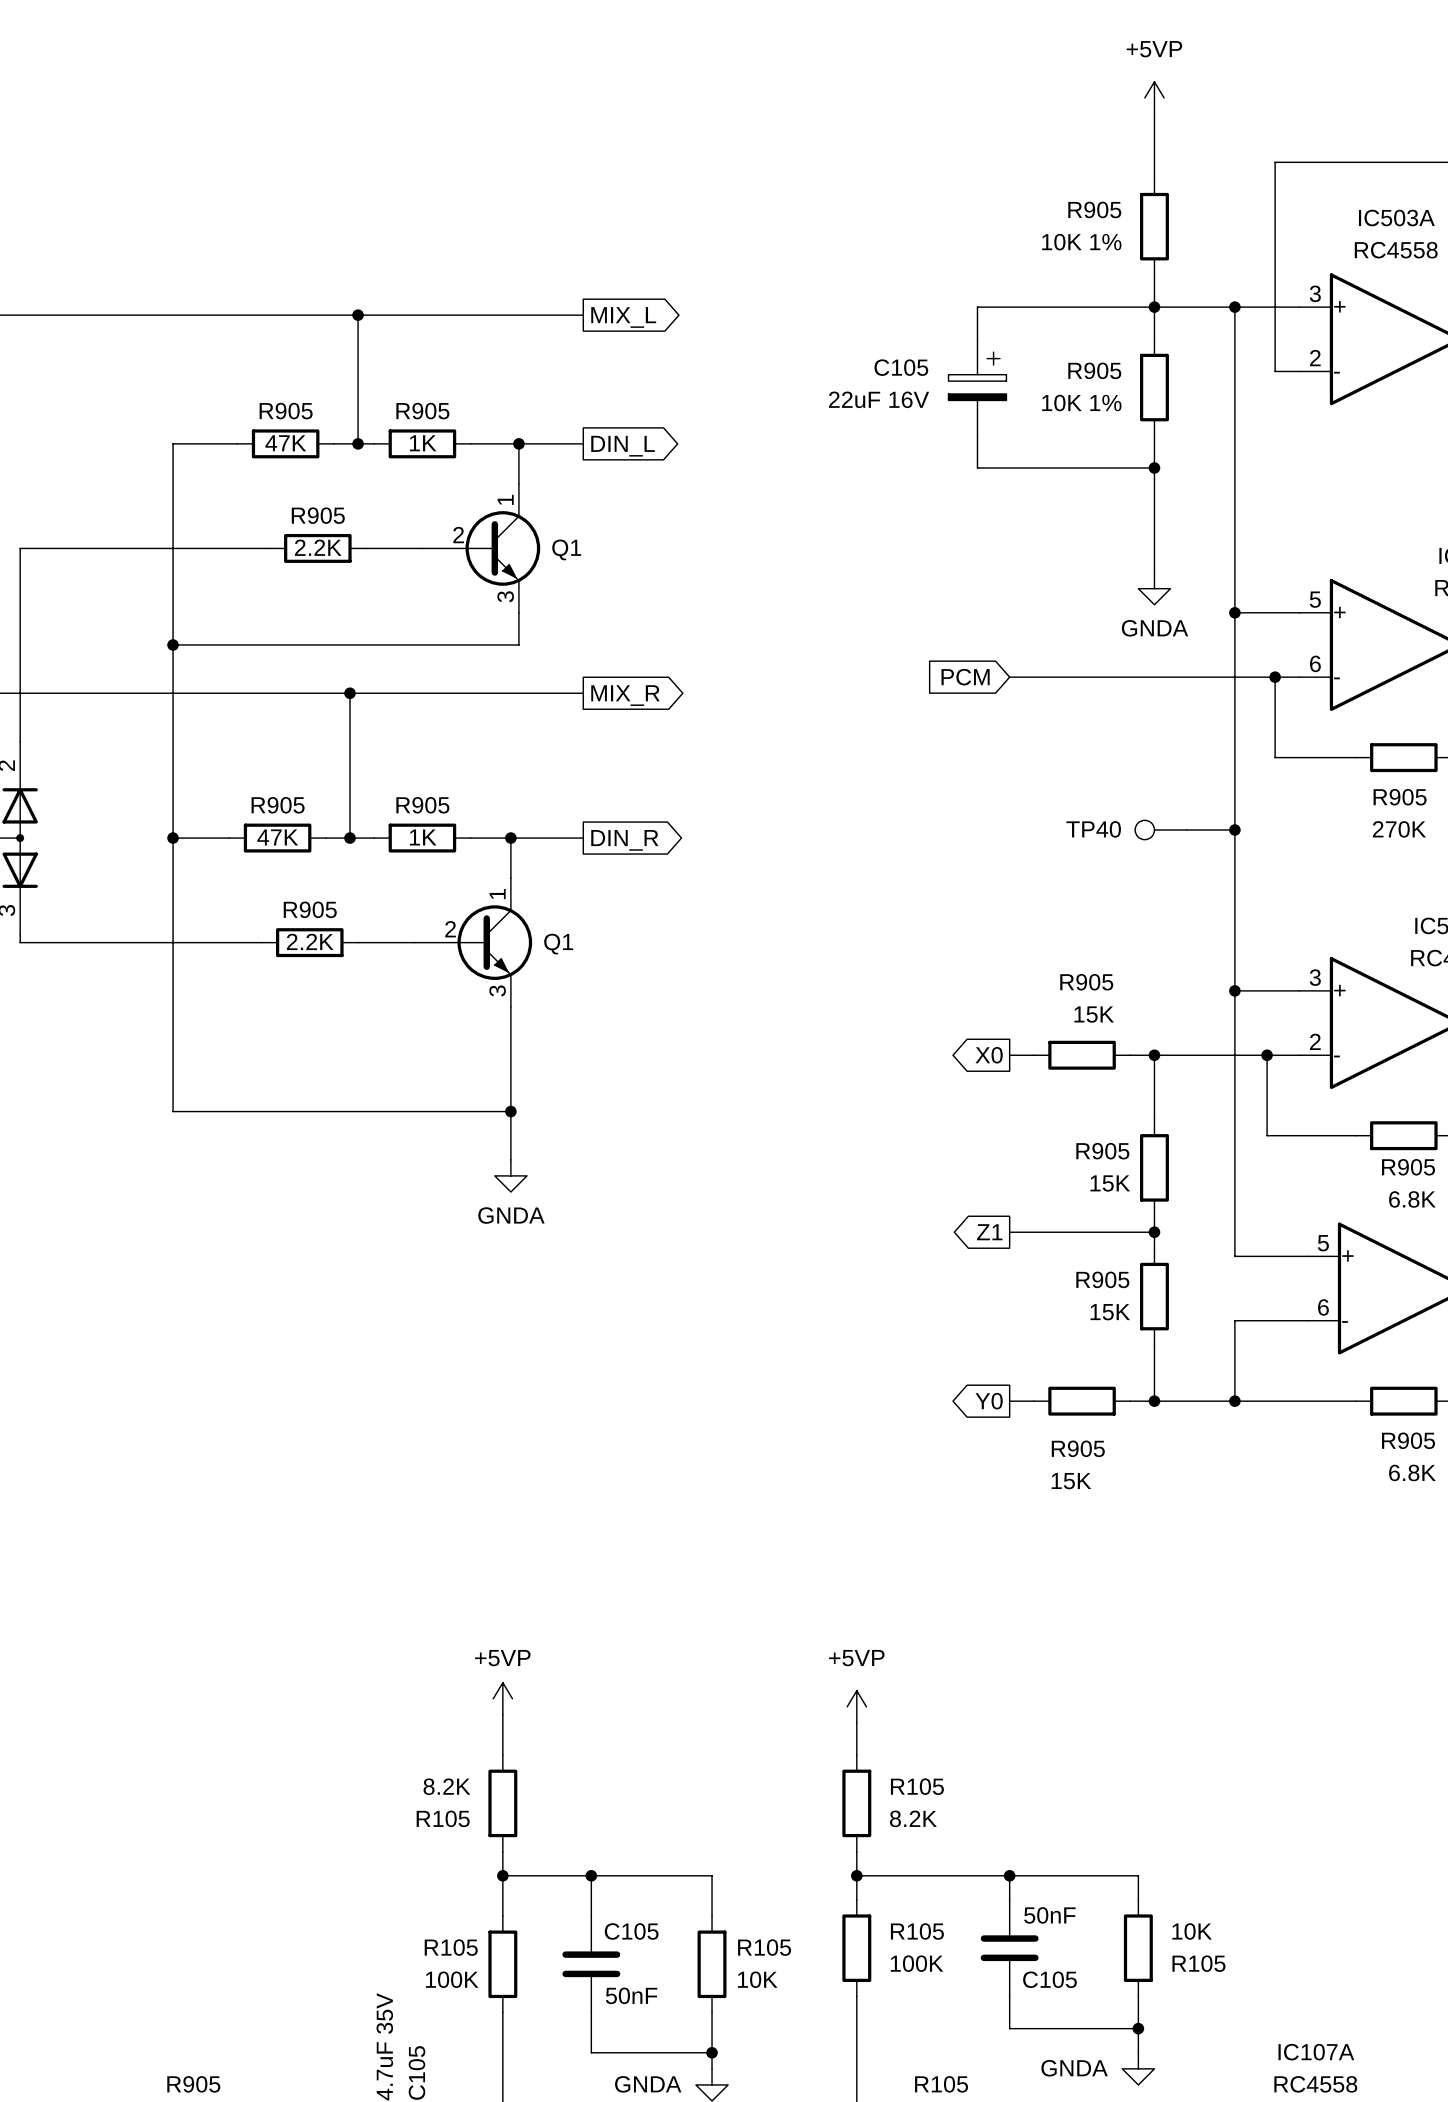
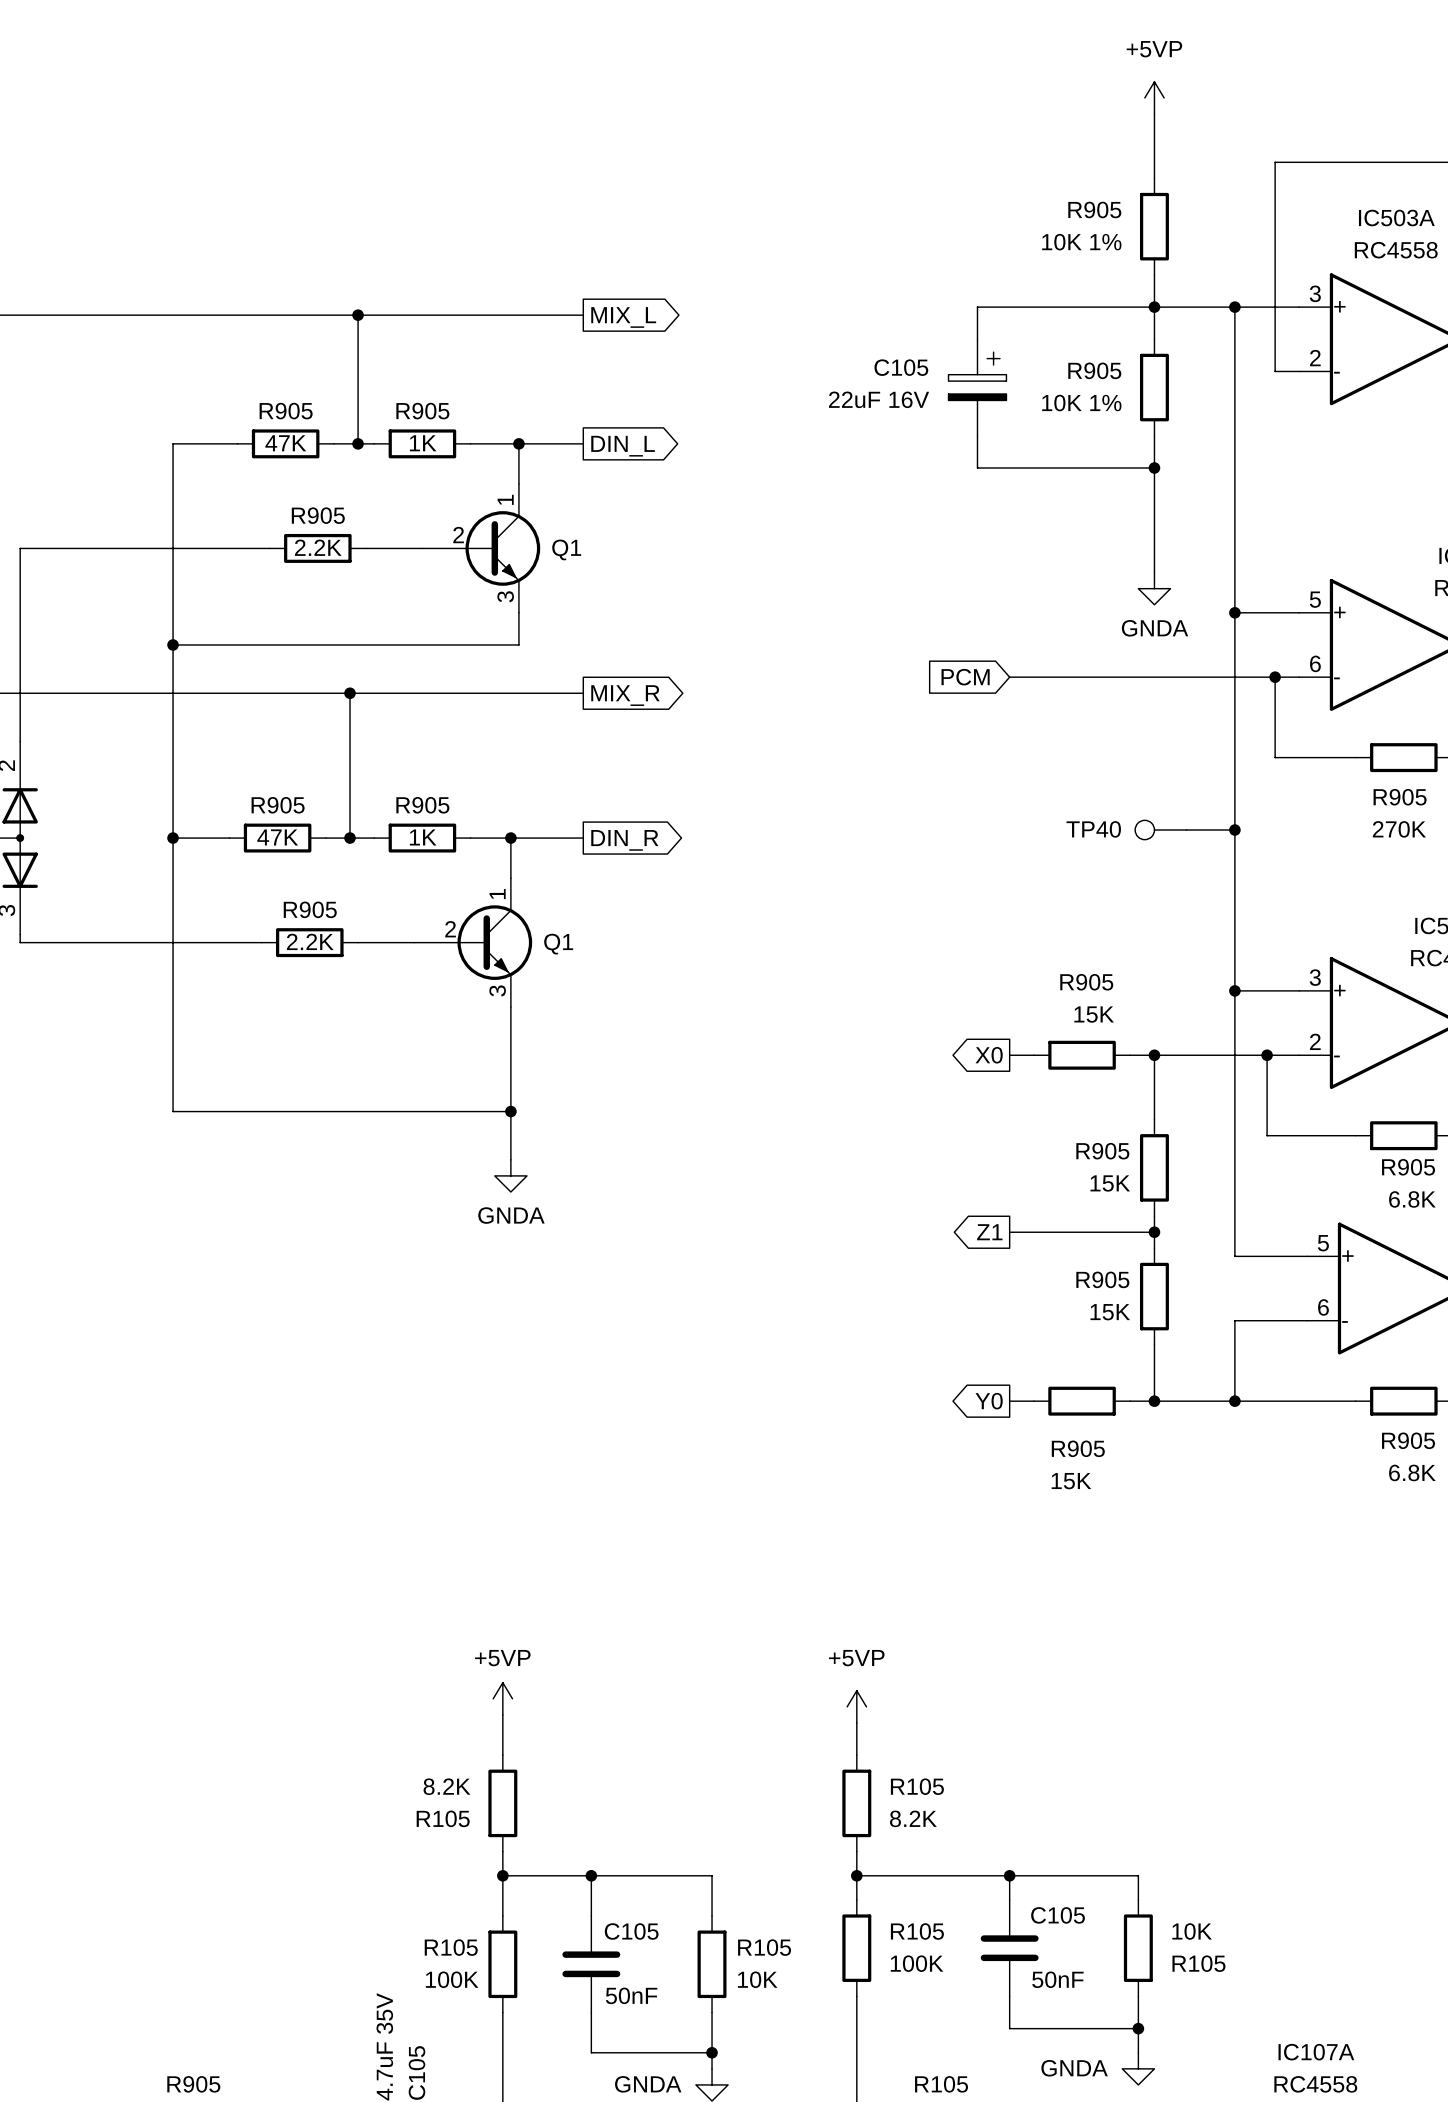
C105 value position: 50nF (1049, 1915) -> 50nF (1057, 1979)
C105 name position: C105 (1049, 1979) -> C105 (1058, 1915)

